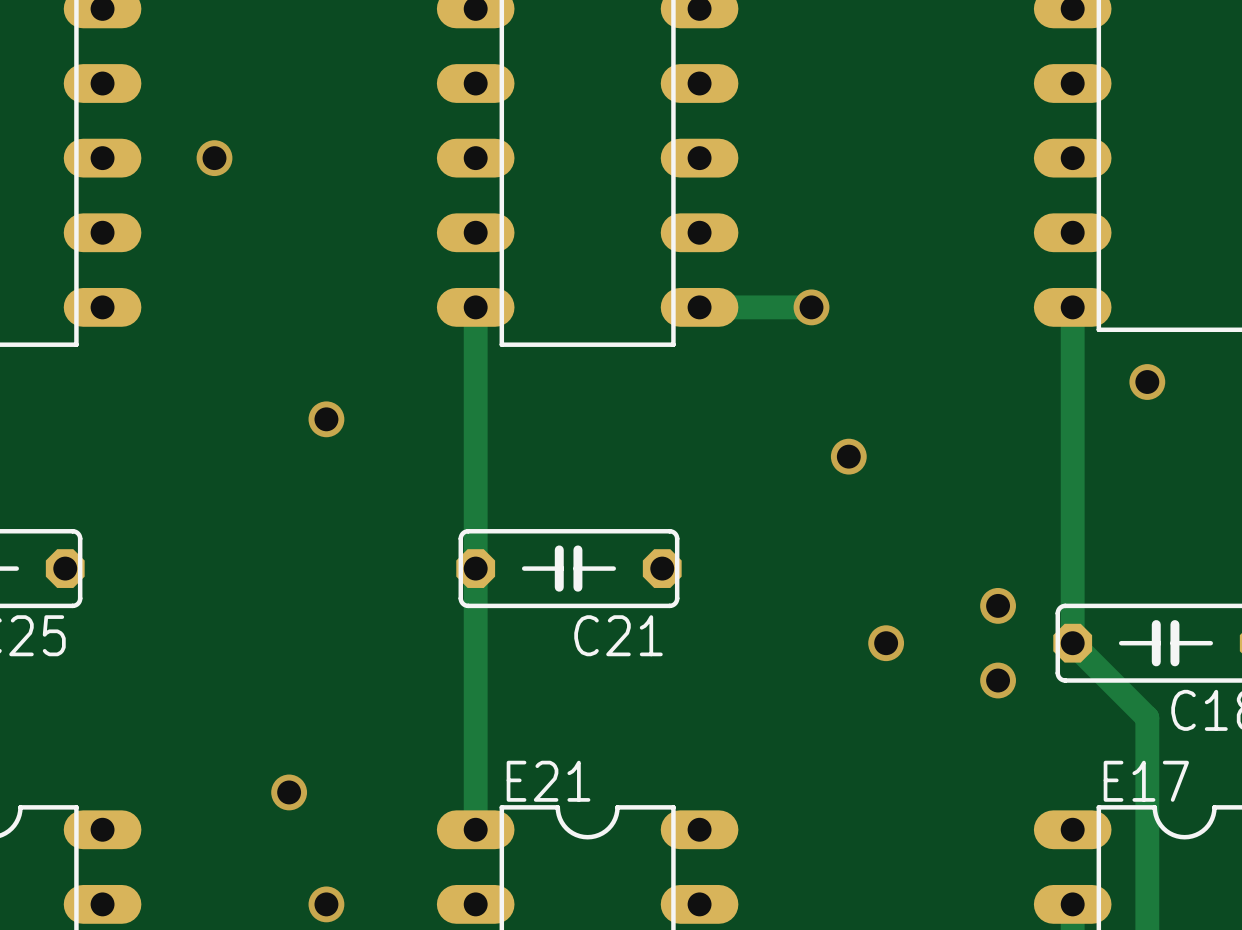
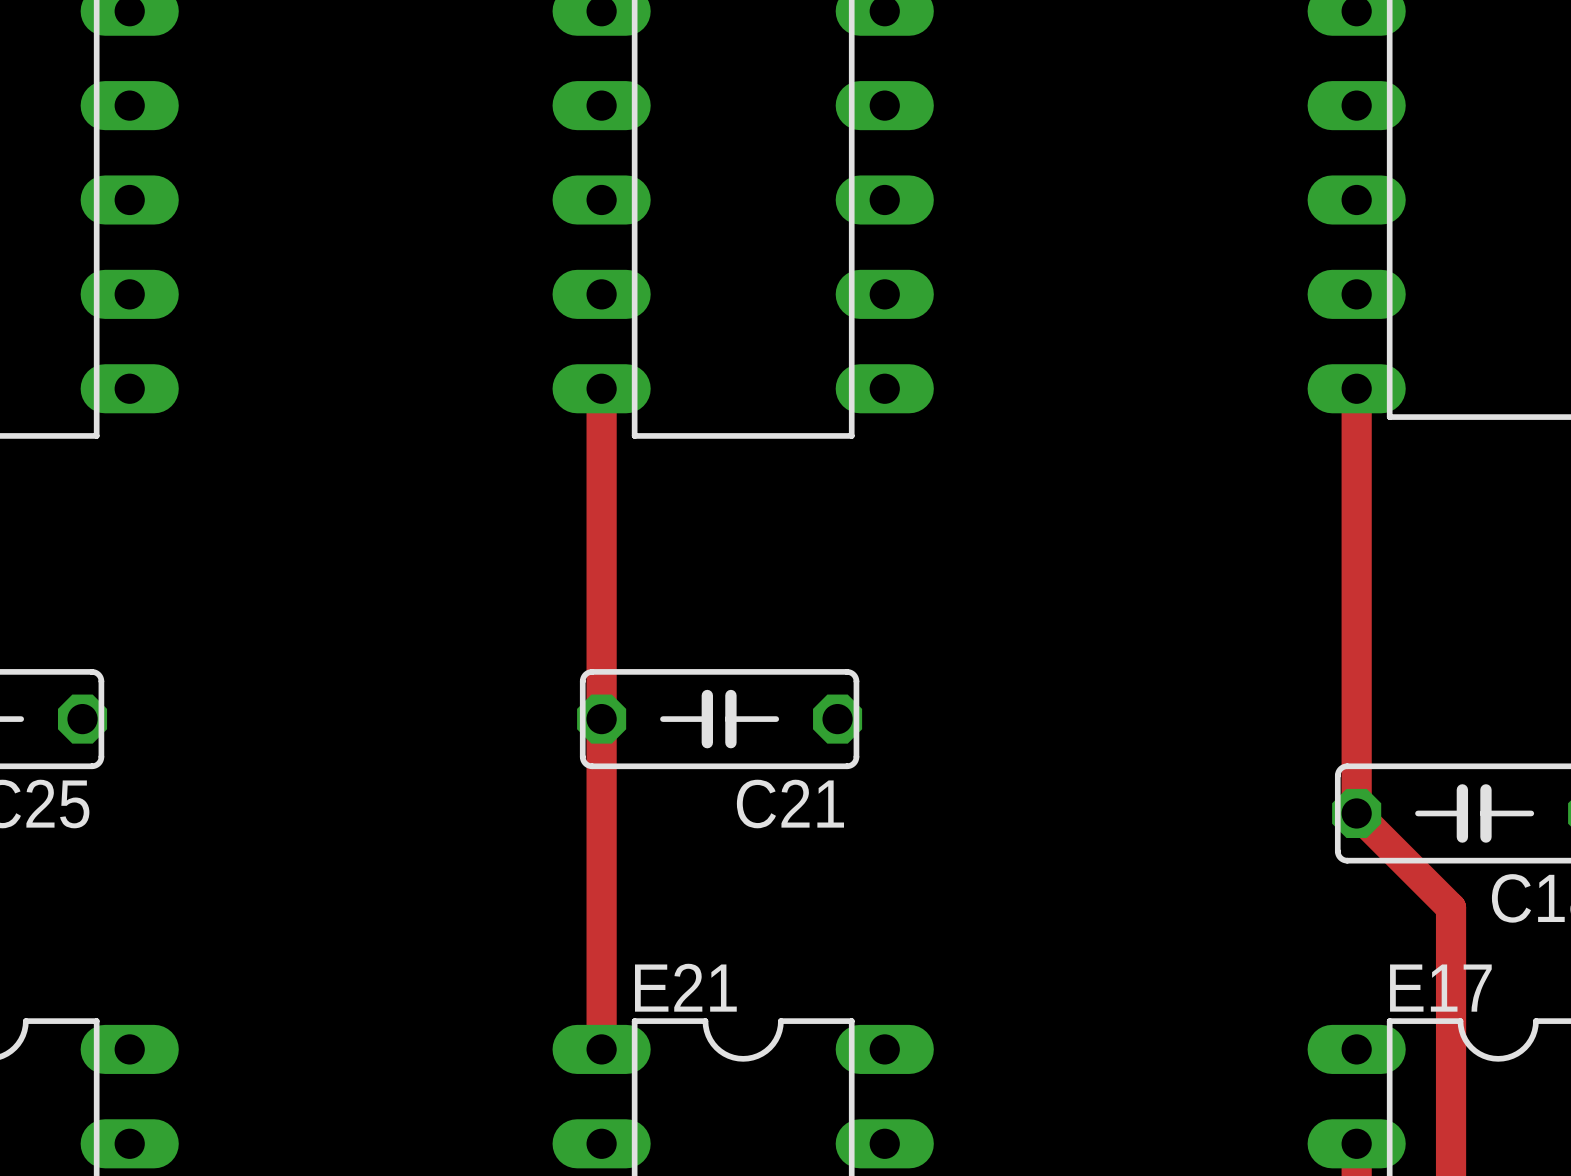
via: (214, 158) -> none
track: (699, 307) (811, 307) -> none
via: (811, 307) -> none
via: (1147, 382) -> none
via: (326, 419) -> none
via: (848, 456) -> none
via: (998, 605) -> none
via: (886, 643) -> none
via: (998, 680) -> none
via: (289, 792) -> none
via: (326, 904) -> none

